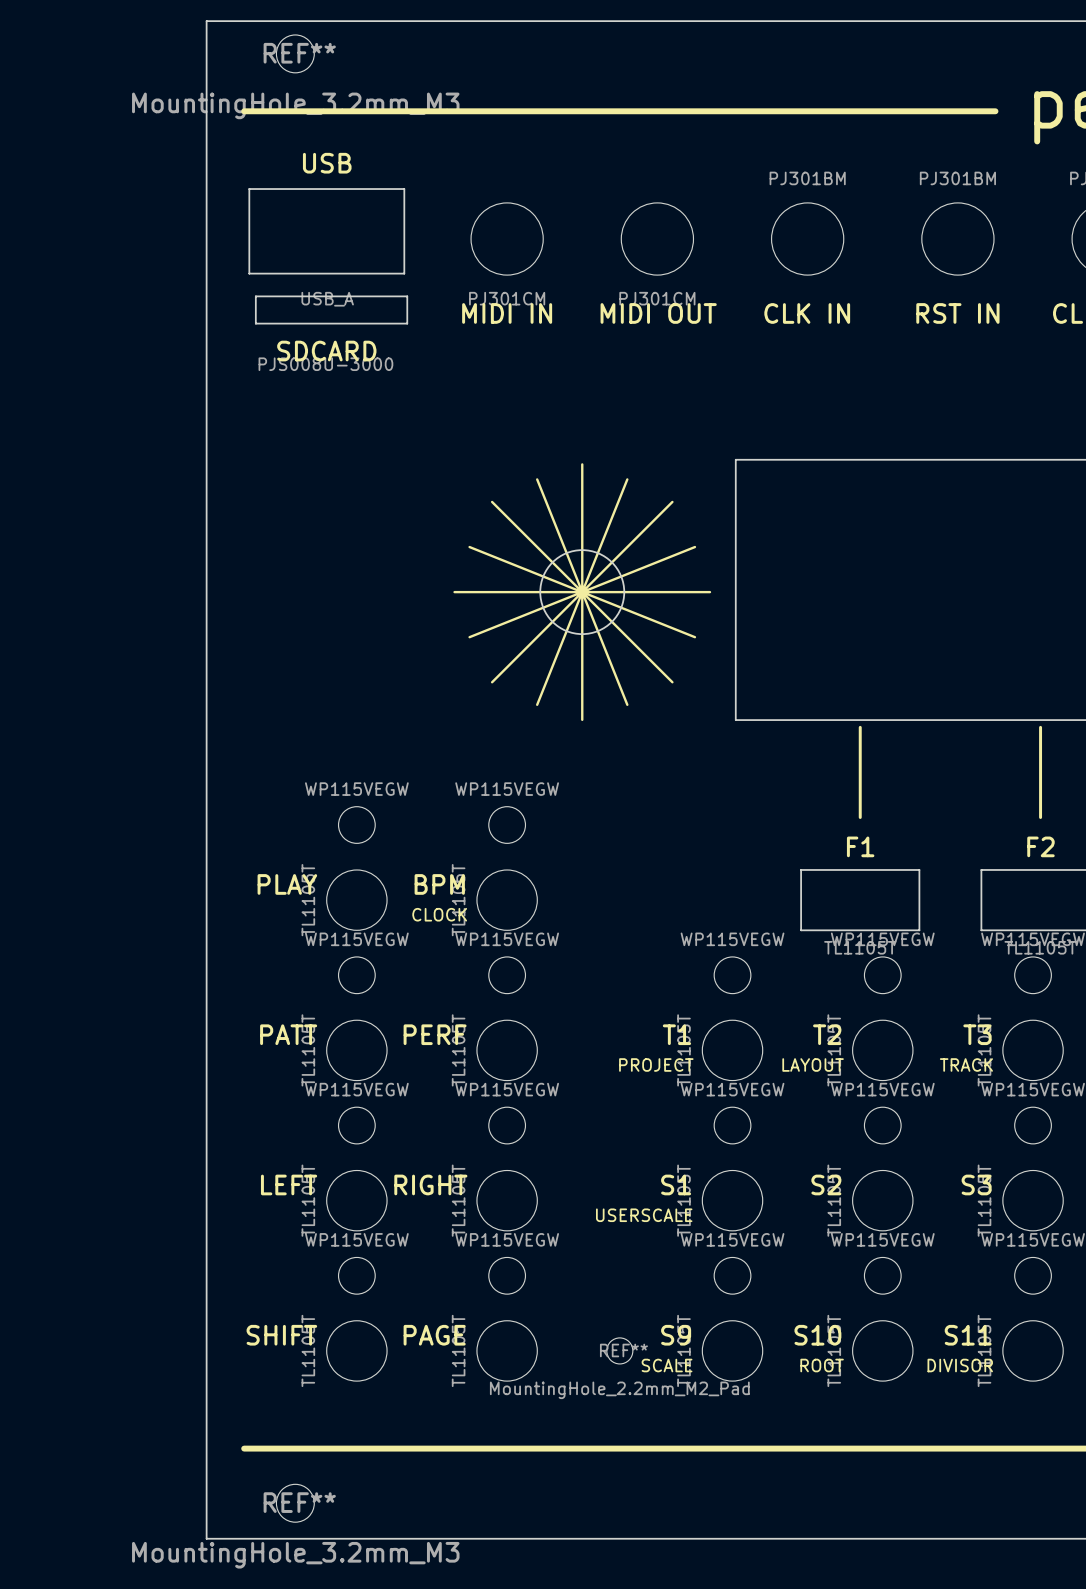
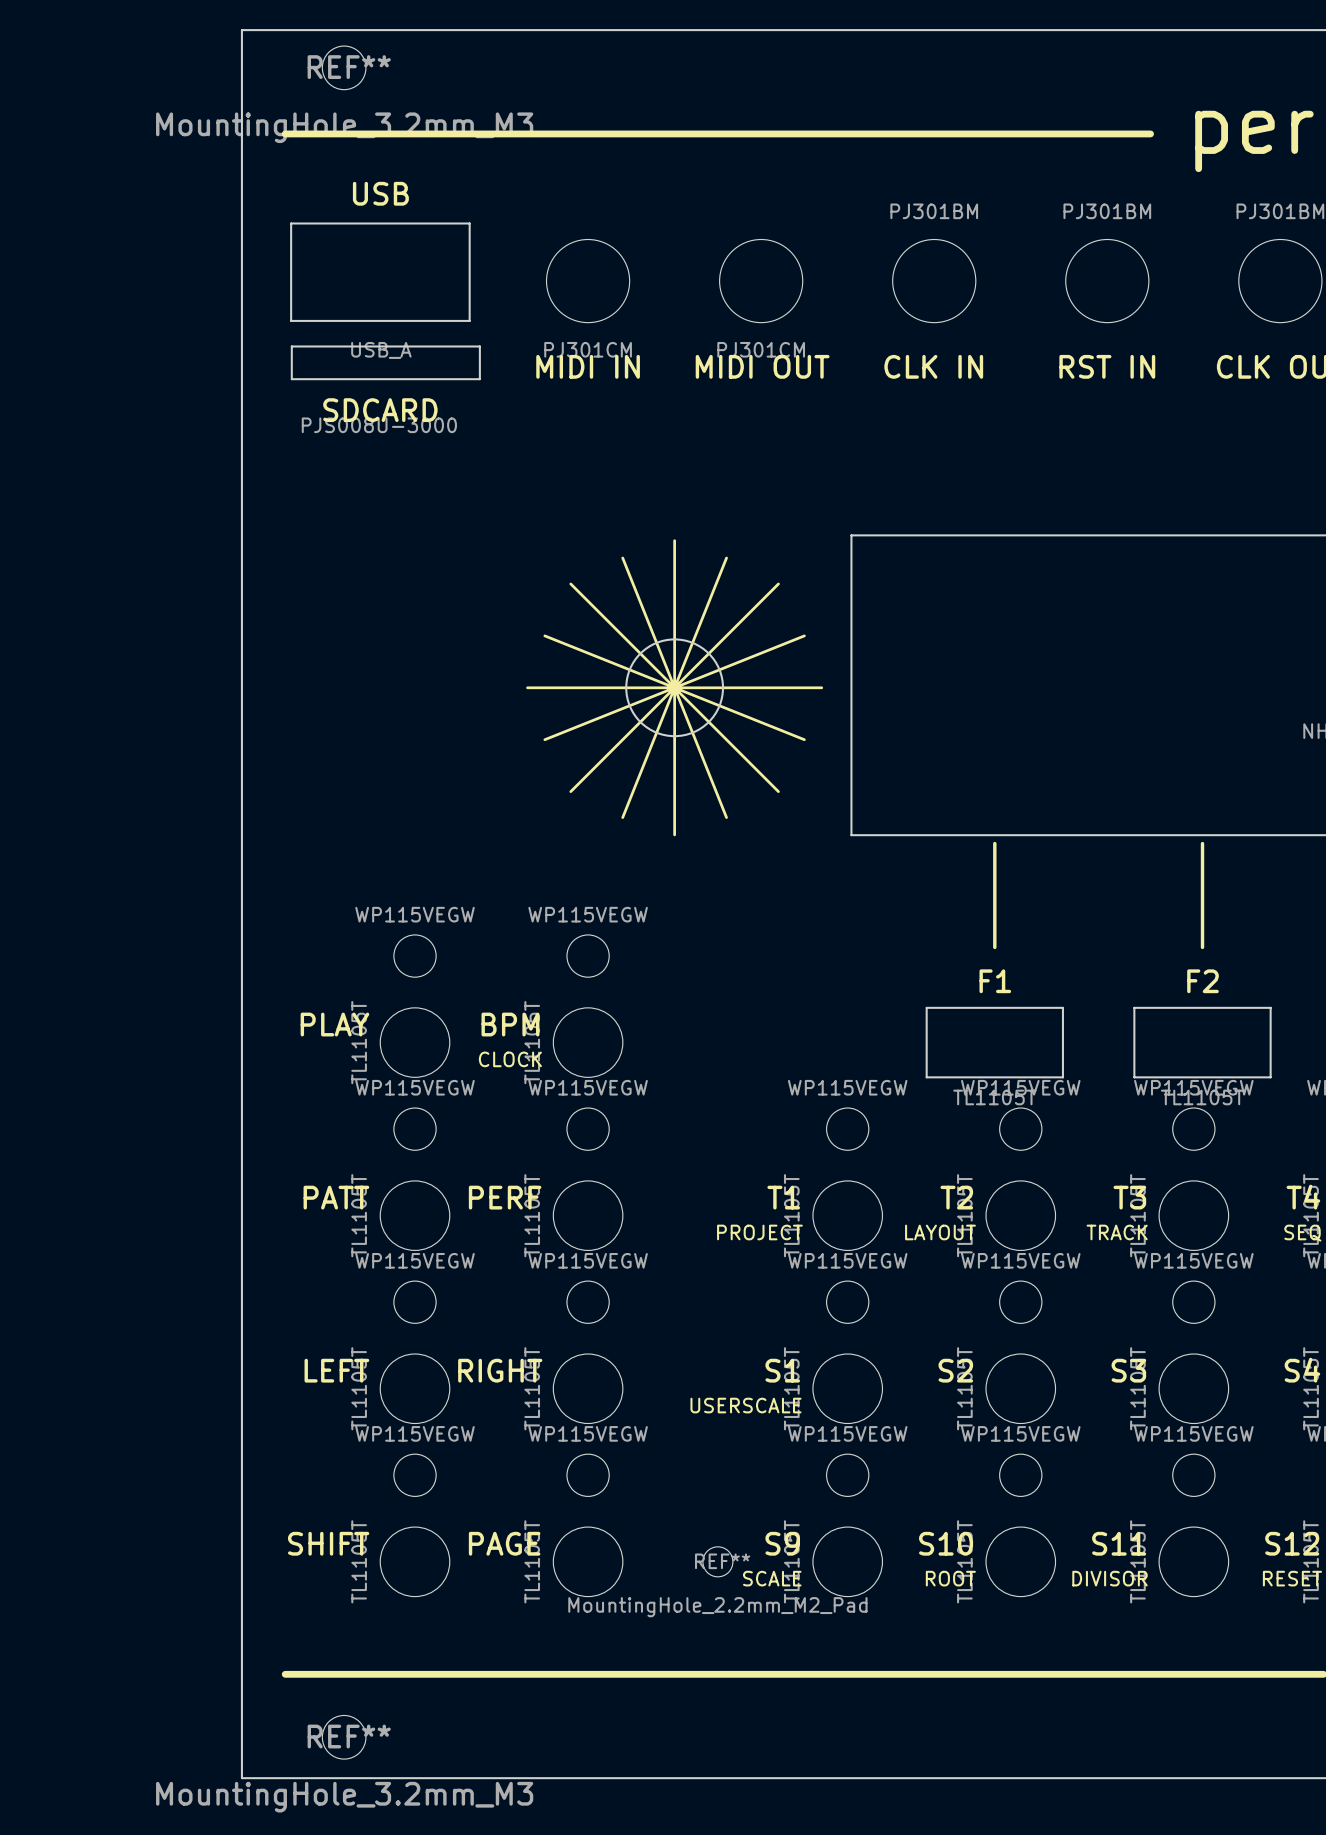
drawing shape: [254, 295, 409, 372] -> [290, 345, 481, 434]

